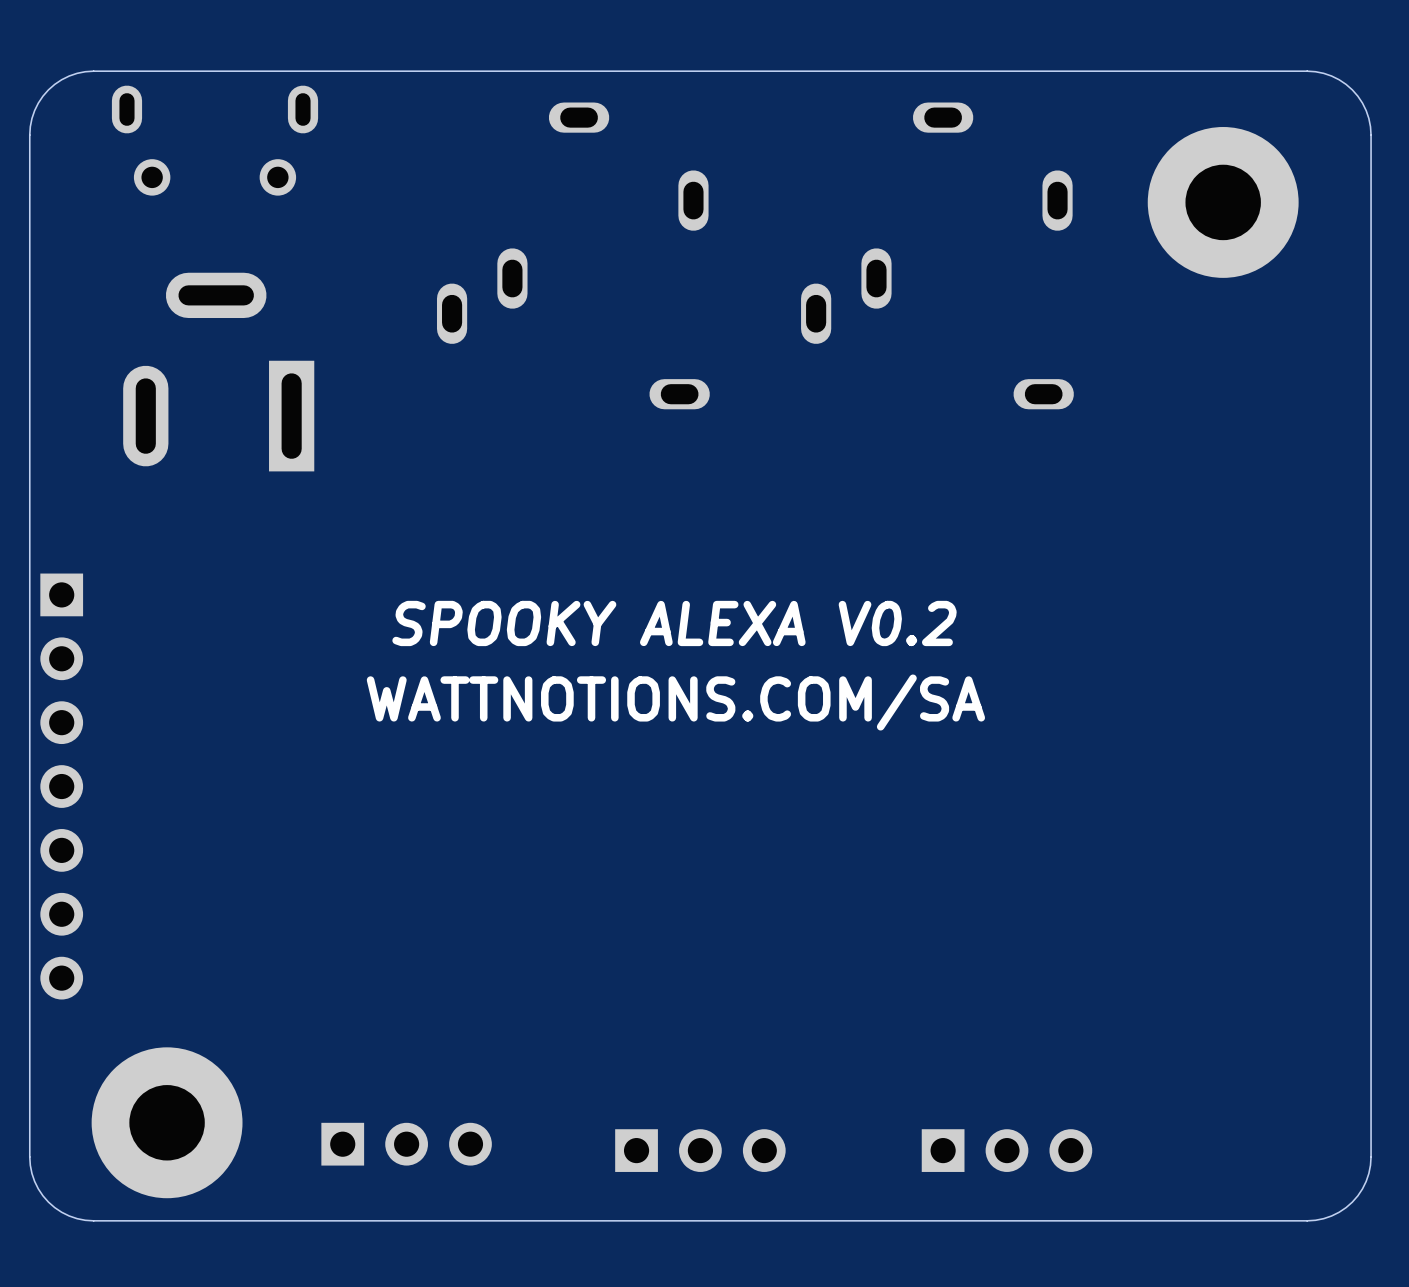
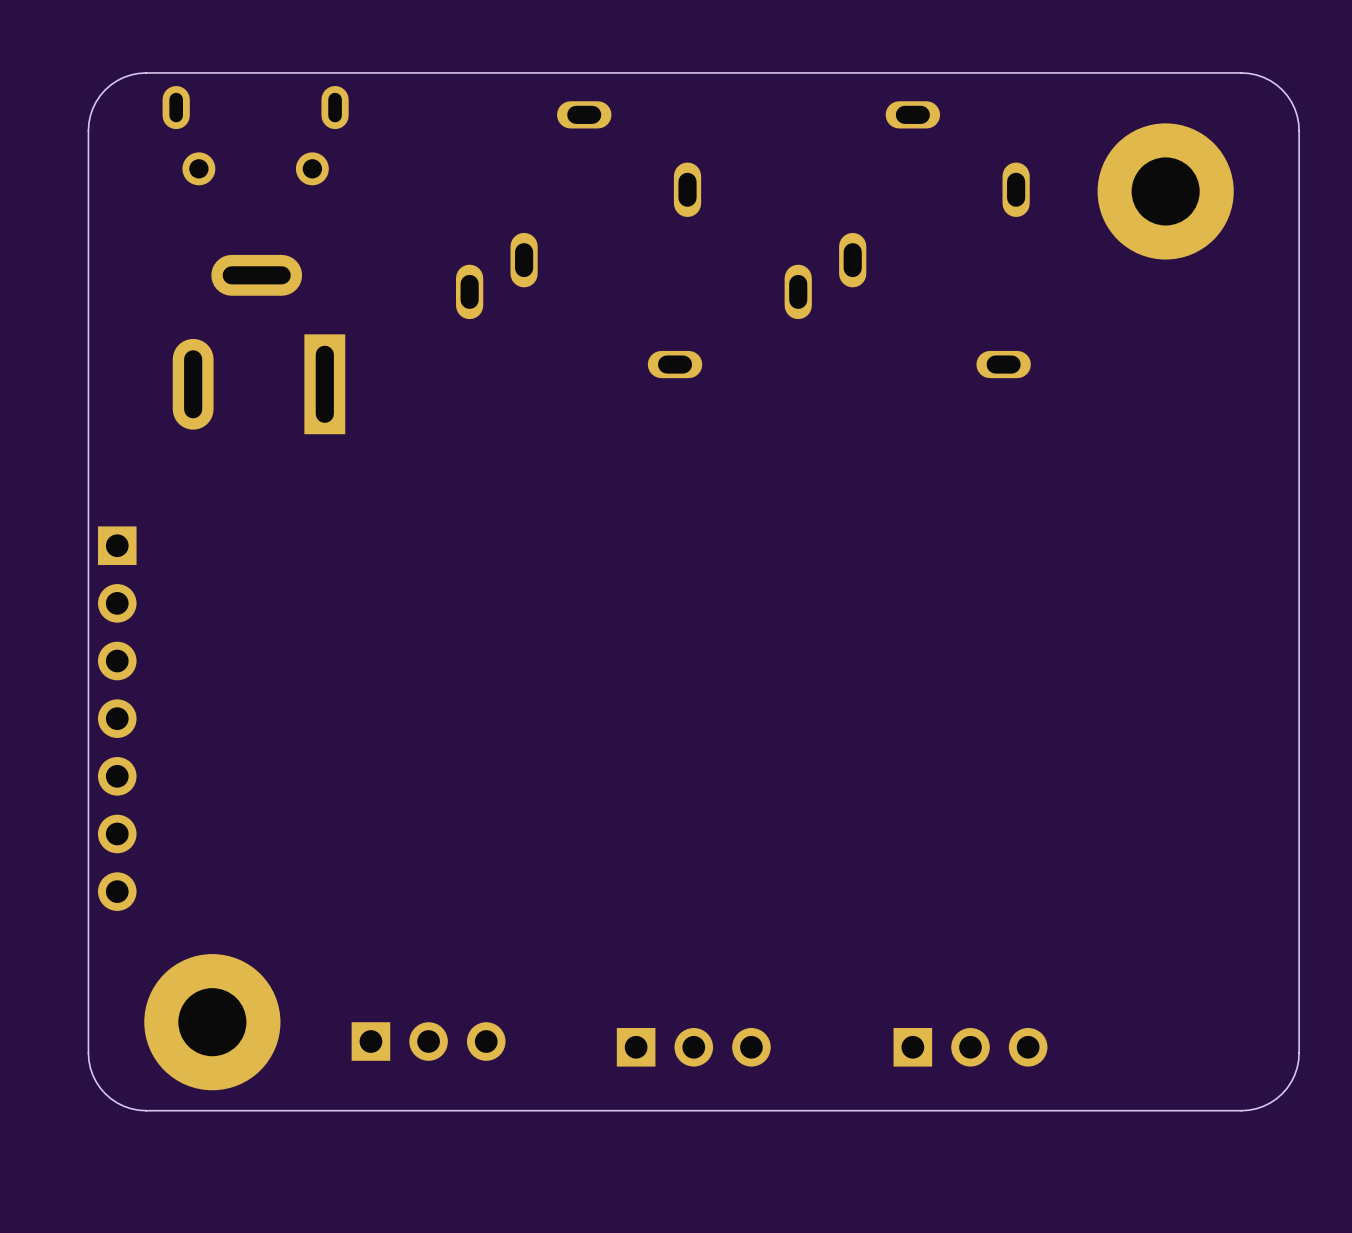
text: SPOOKY ALEXA V0.2 (674, 623) -> none
text: WATTNOTIONS.COM/SA (675, 702) -> none

